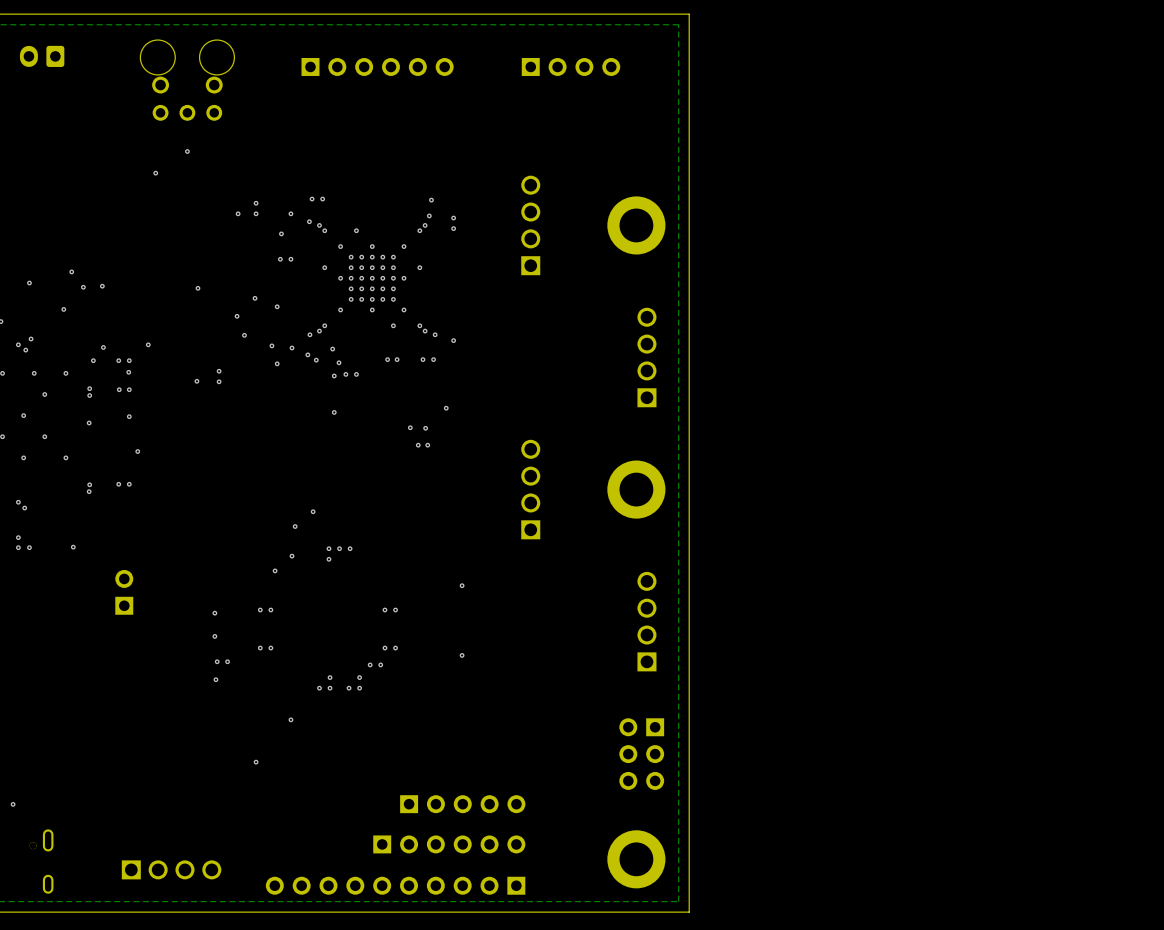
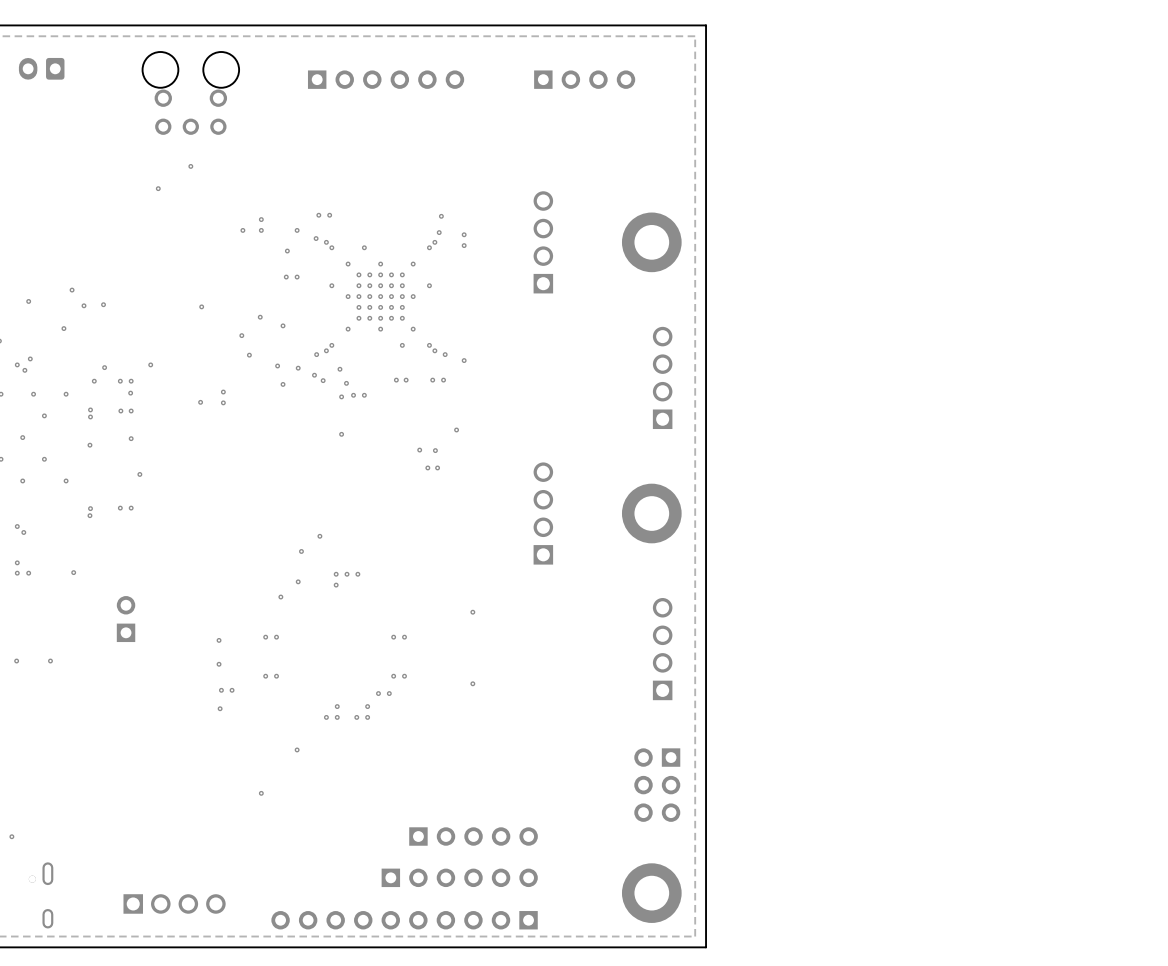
via: none -> (16, 661)
via: none -> (50, 661)

